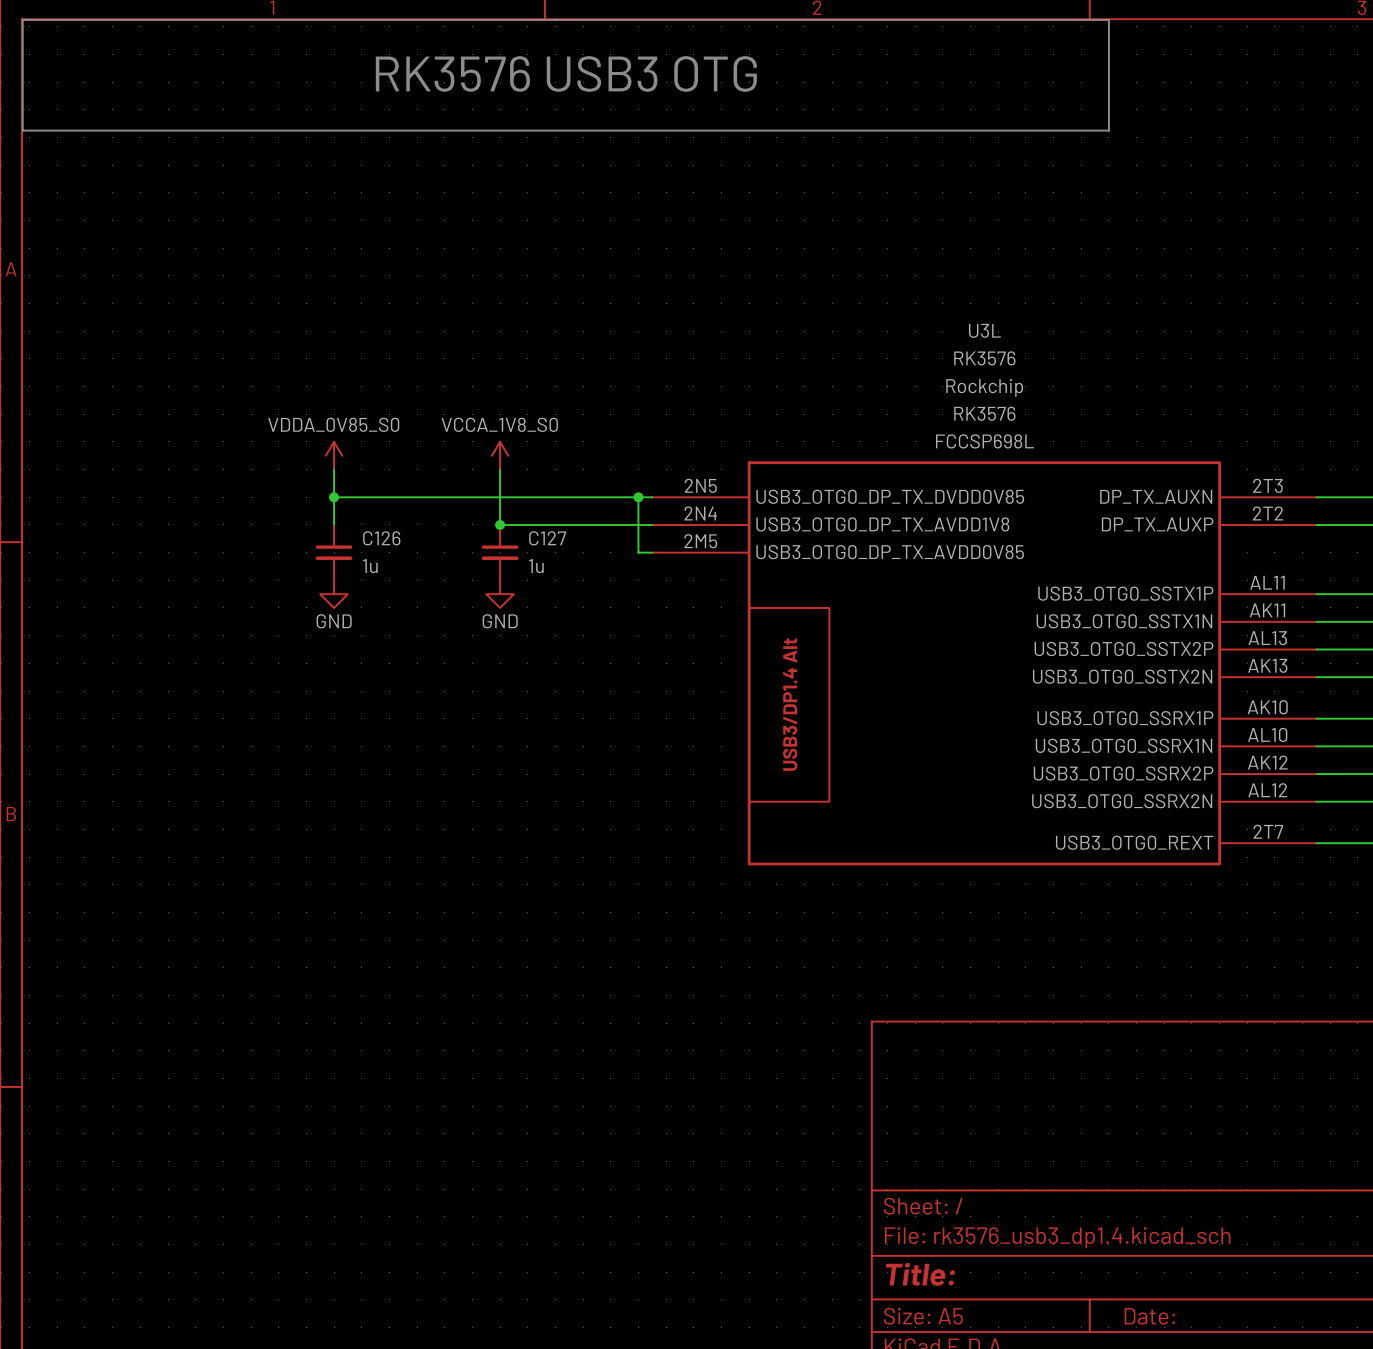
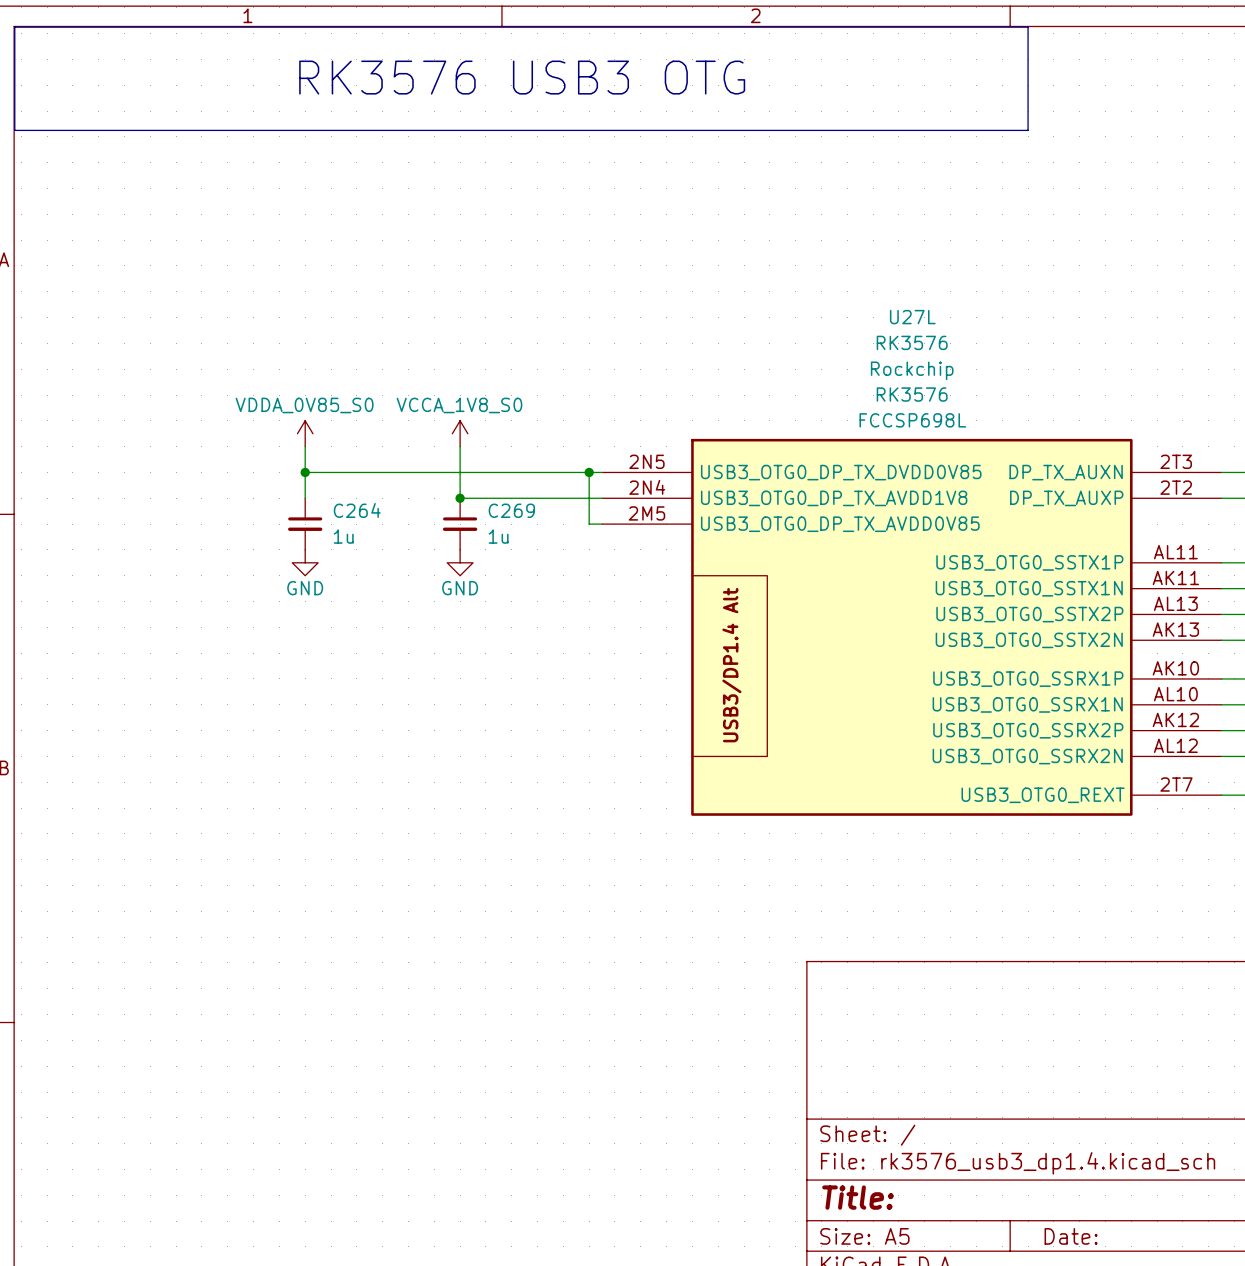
U3L name: U3L (984, 330) -> U27L (912, 317)
C126 name: C126 (381, 538) -> C264 (357, 510)
C127 name: C127 (547, 538) -> C269 (511, 510)

